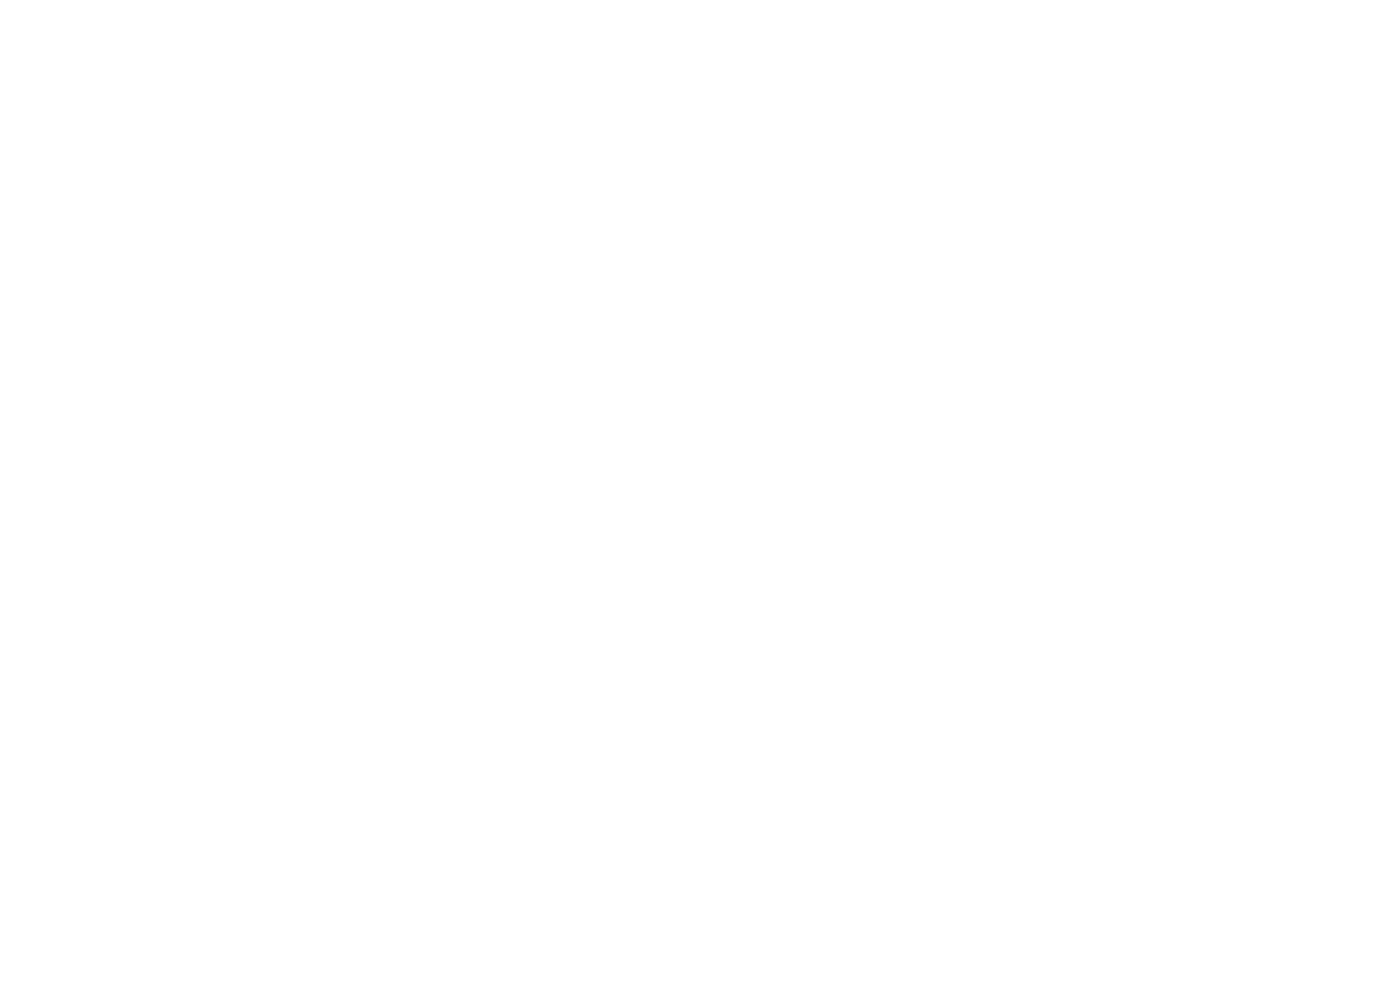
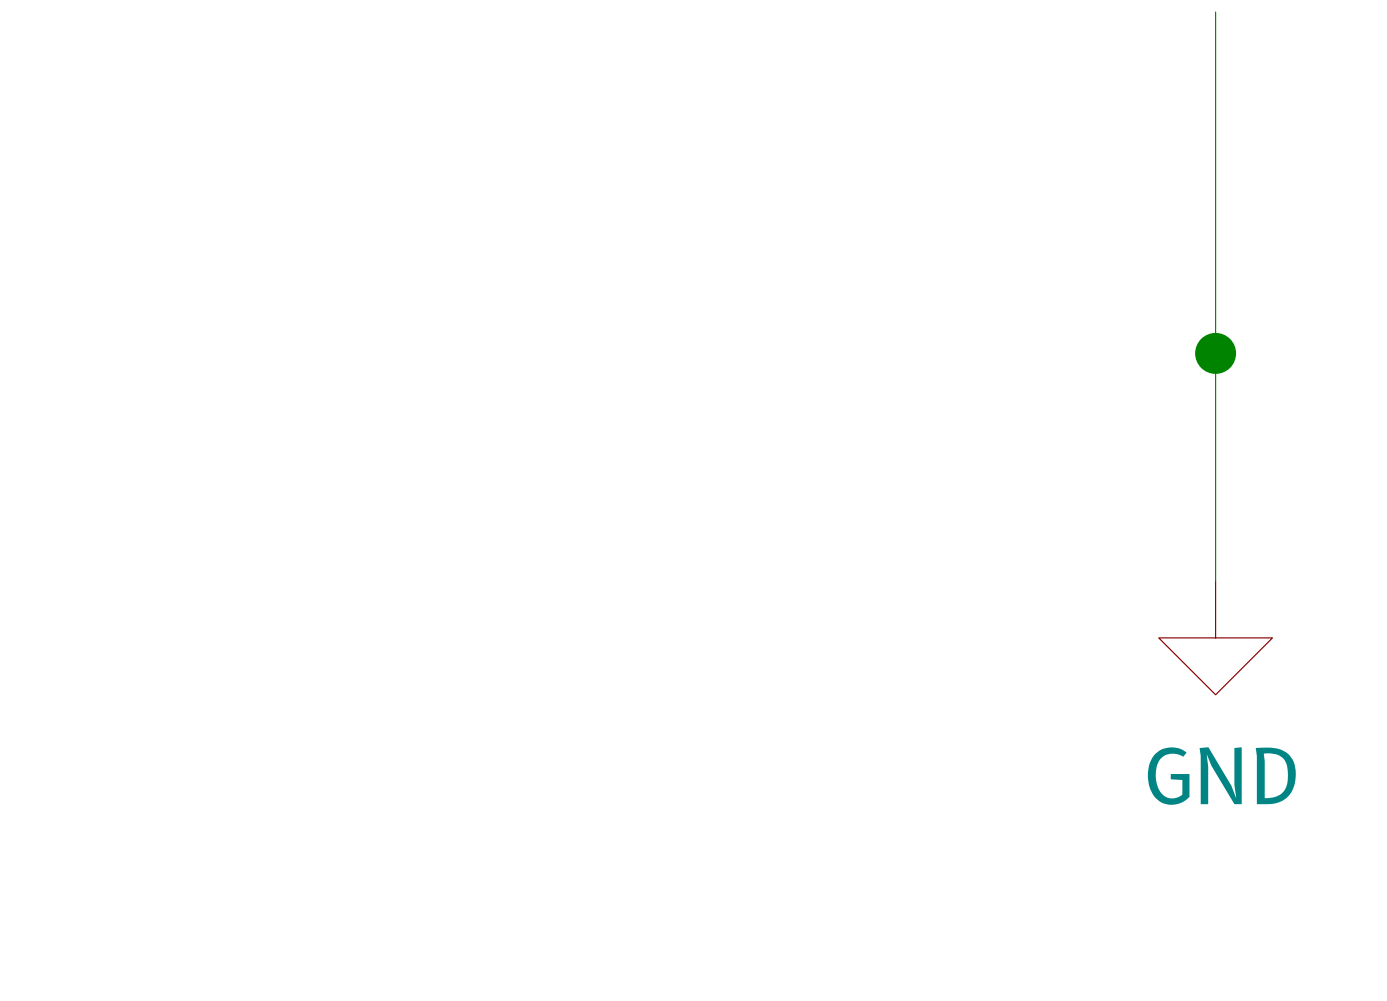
wire: none -> (1215, 12) (1215, 580)
junction: none -> (1215, 353)
power symbol: none -> GND (1215, 637)

